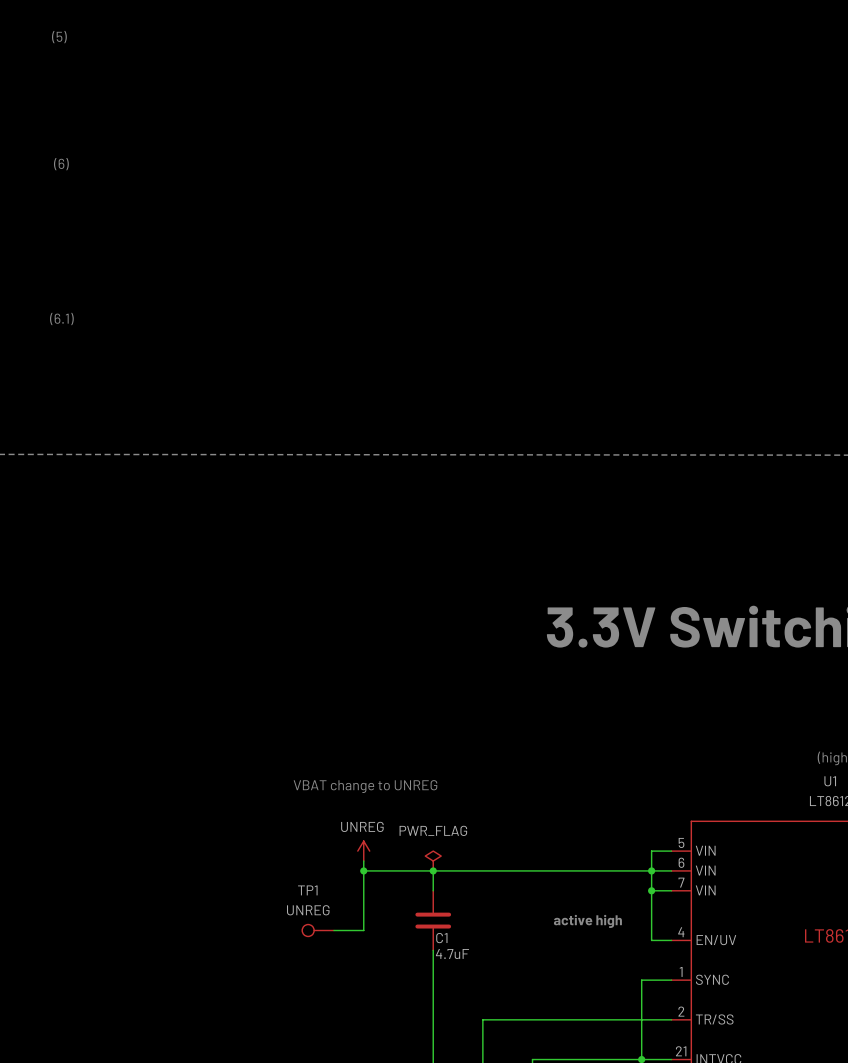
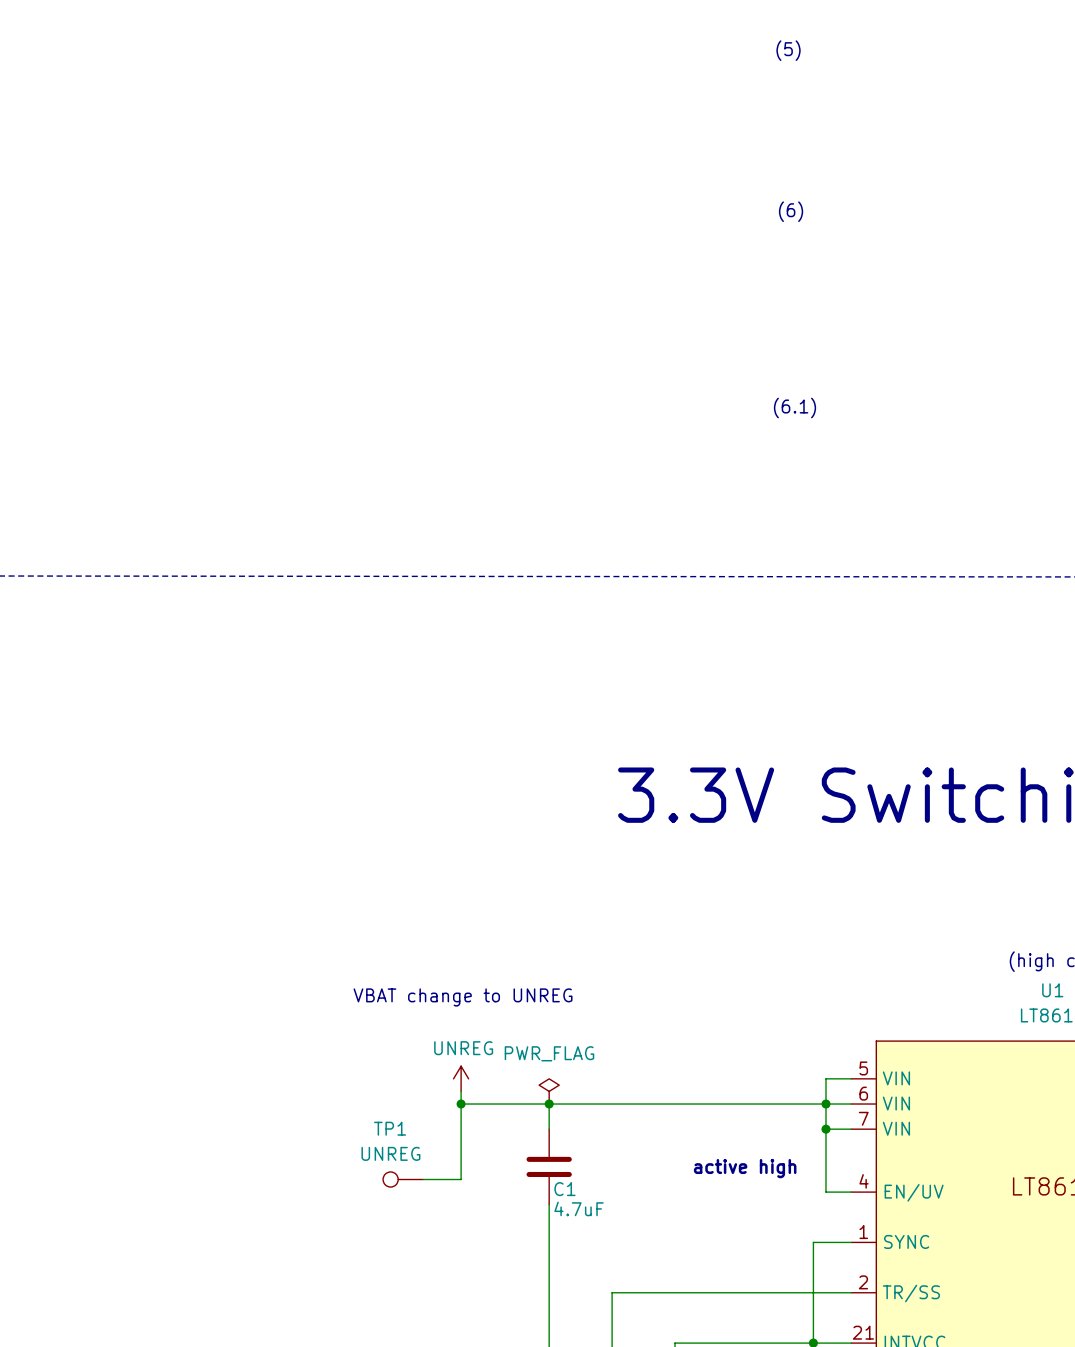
text: (5) (59, 37) -> none
text: none -> (5) (788, 50)
text: (6) (61, 164) -> none
text: none -> (6) (791, 211)
text: (6.1) (61, 318) -> none
text: none -> (6.1) (794, 408)

